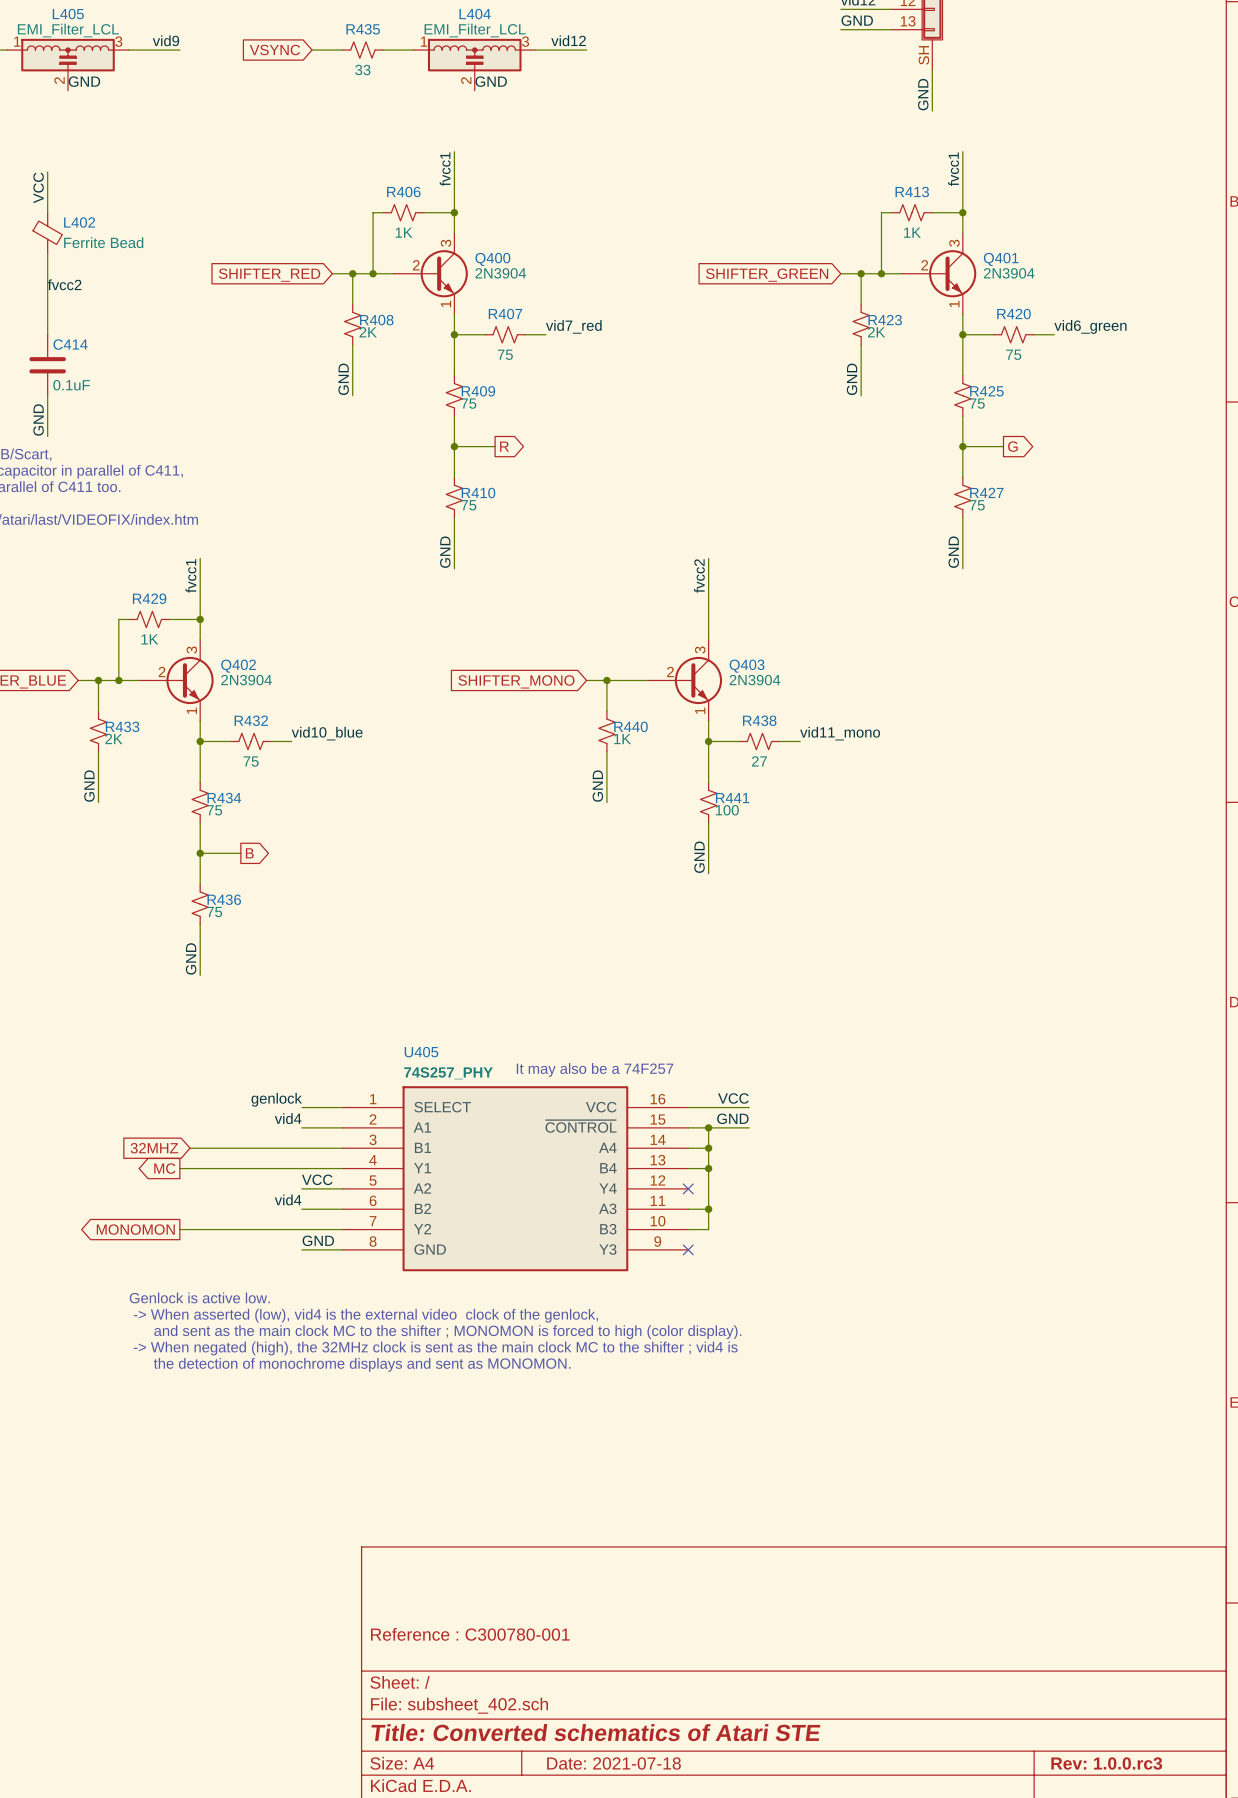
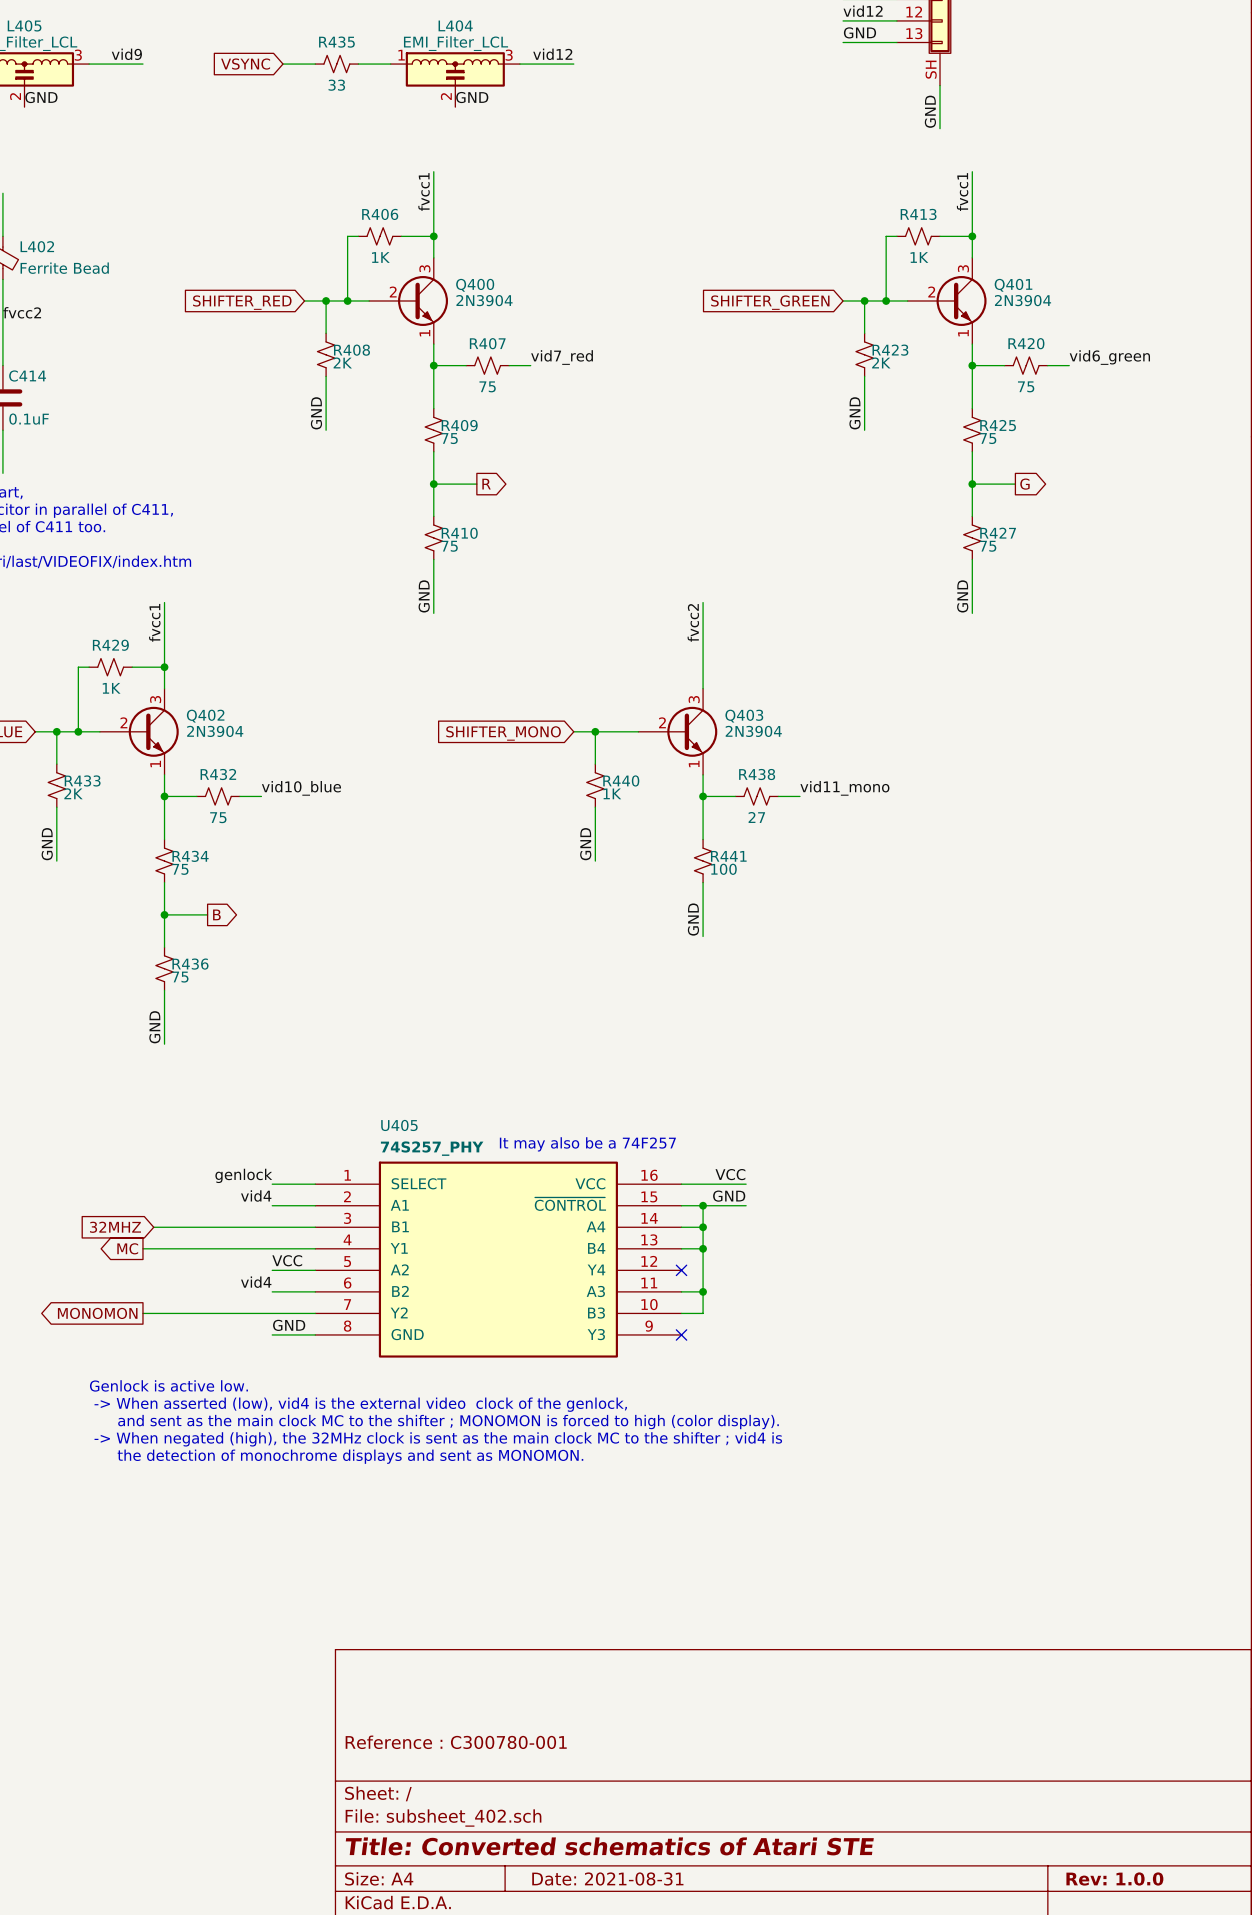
title block: Date: 2021-07-18 (614, 1763) -> Date: 2021-08-31 (607, 1879)
title block: Rev: 1.0.0.rc3 (1106, 1763) -> Rev: 1.0.0 (1114, 1879)

